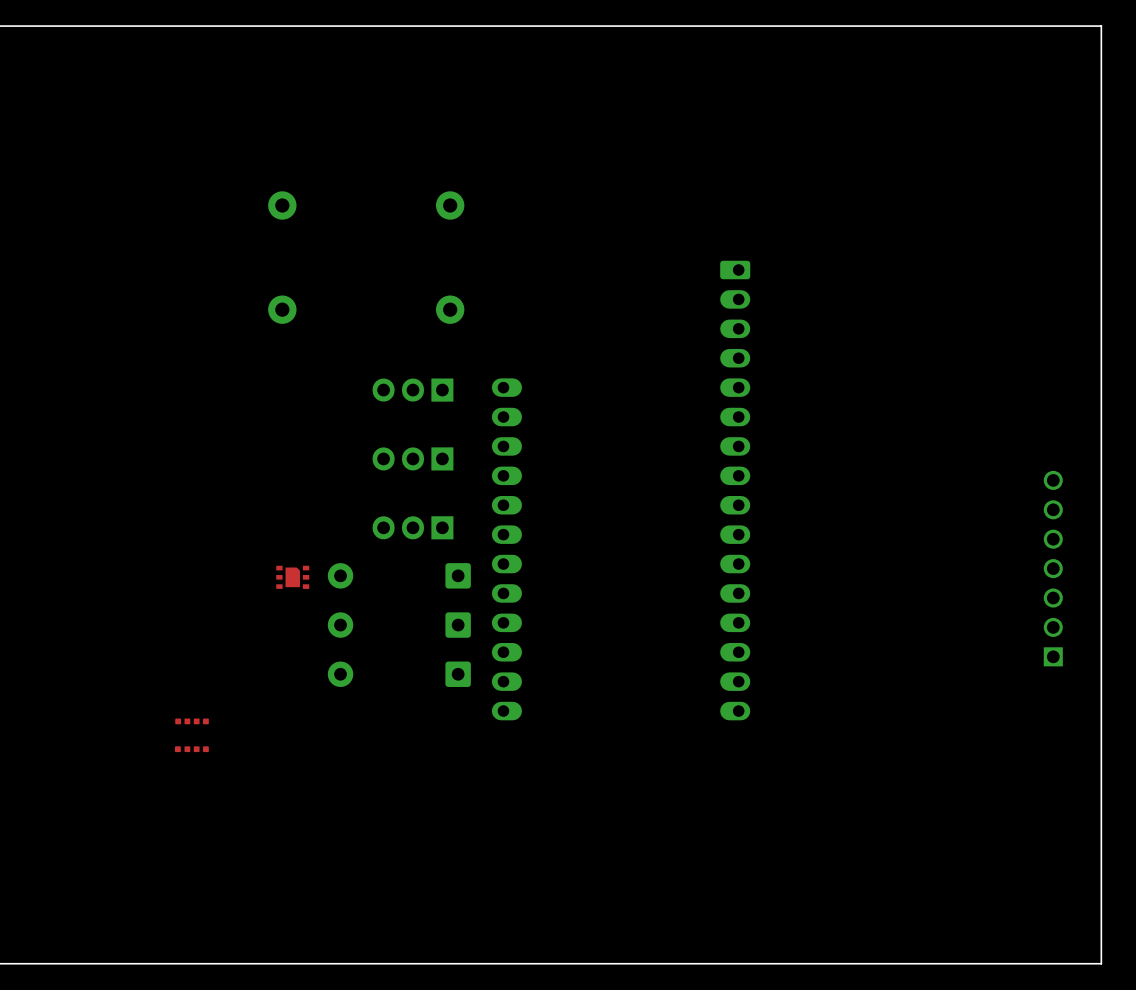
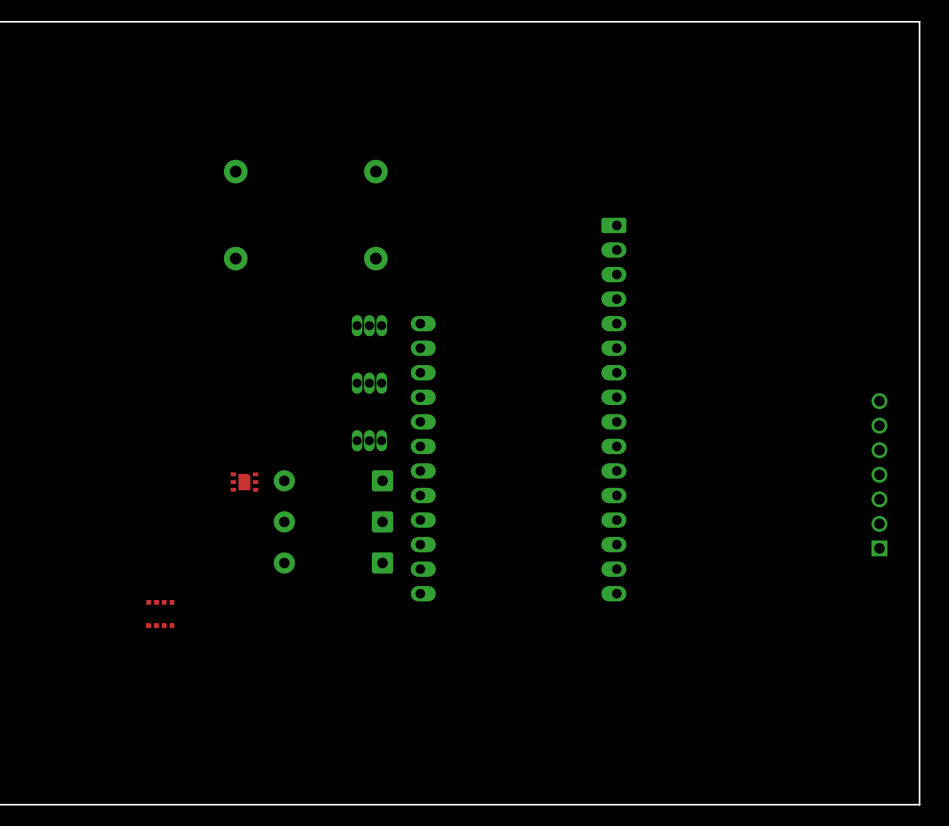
part: (412, 390) -> none
part: none -> (369, 325)
part: (412, 458) -> none
part: none -> (369, 383)
part: (412, 527) -> none
part: none -> (369, 440)

